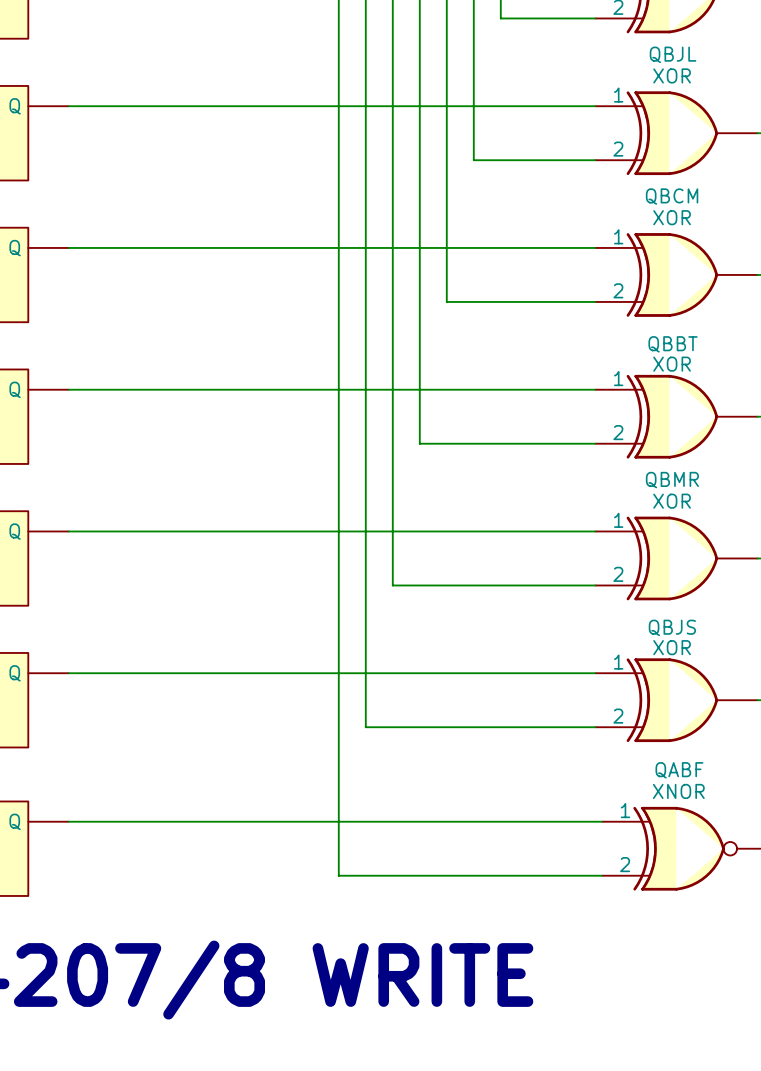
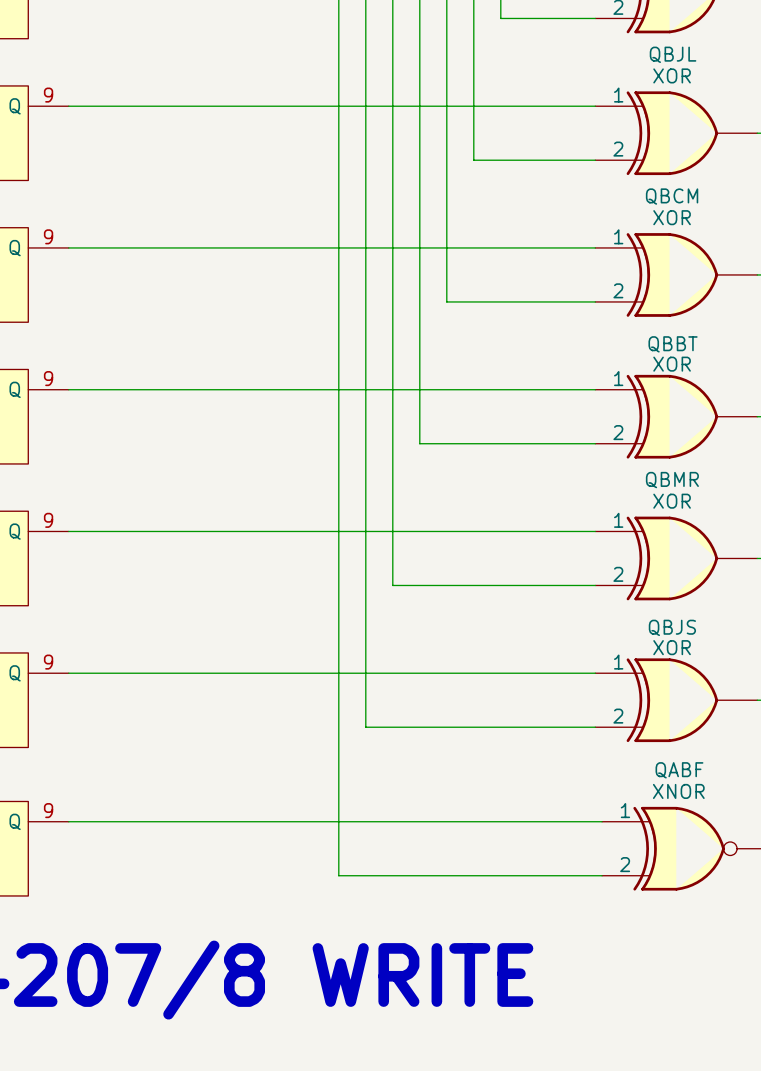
part pin number: none -> 9 (48, 95)
part pin number: none -> 9 (48, 236)
part pin number: none -> 9 (48, 378)
part pin number: none -> 9 (48, 520)
part pin number: none -> 9 (48, 662)
part pin number: none -> 9 (48, 810)

